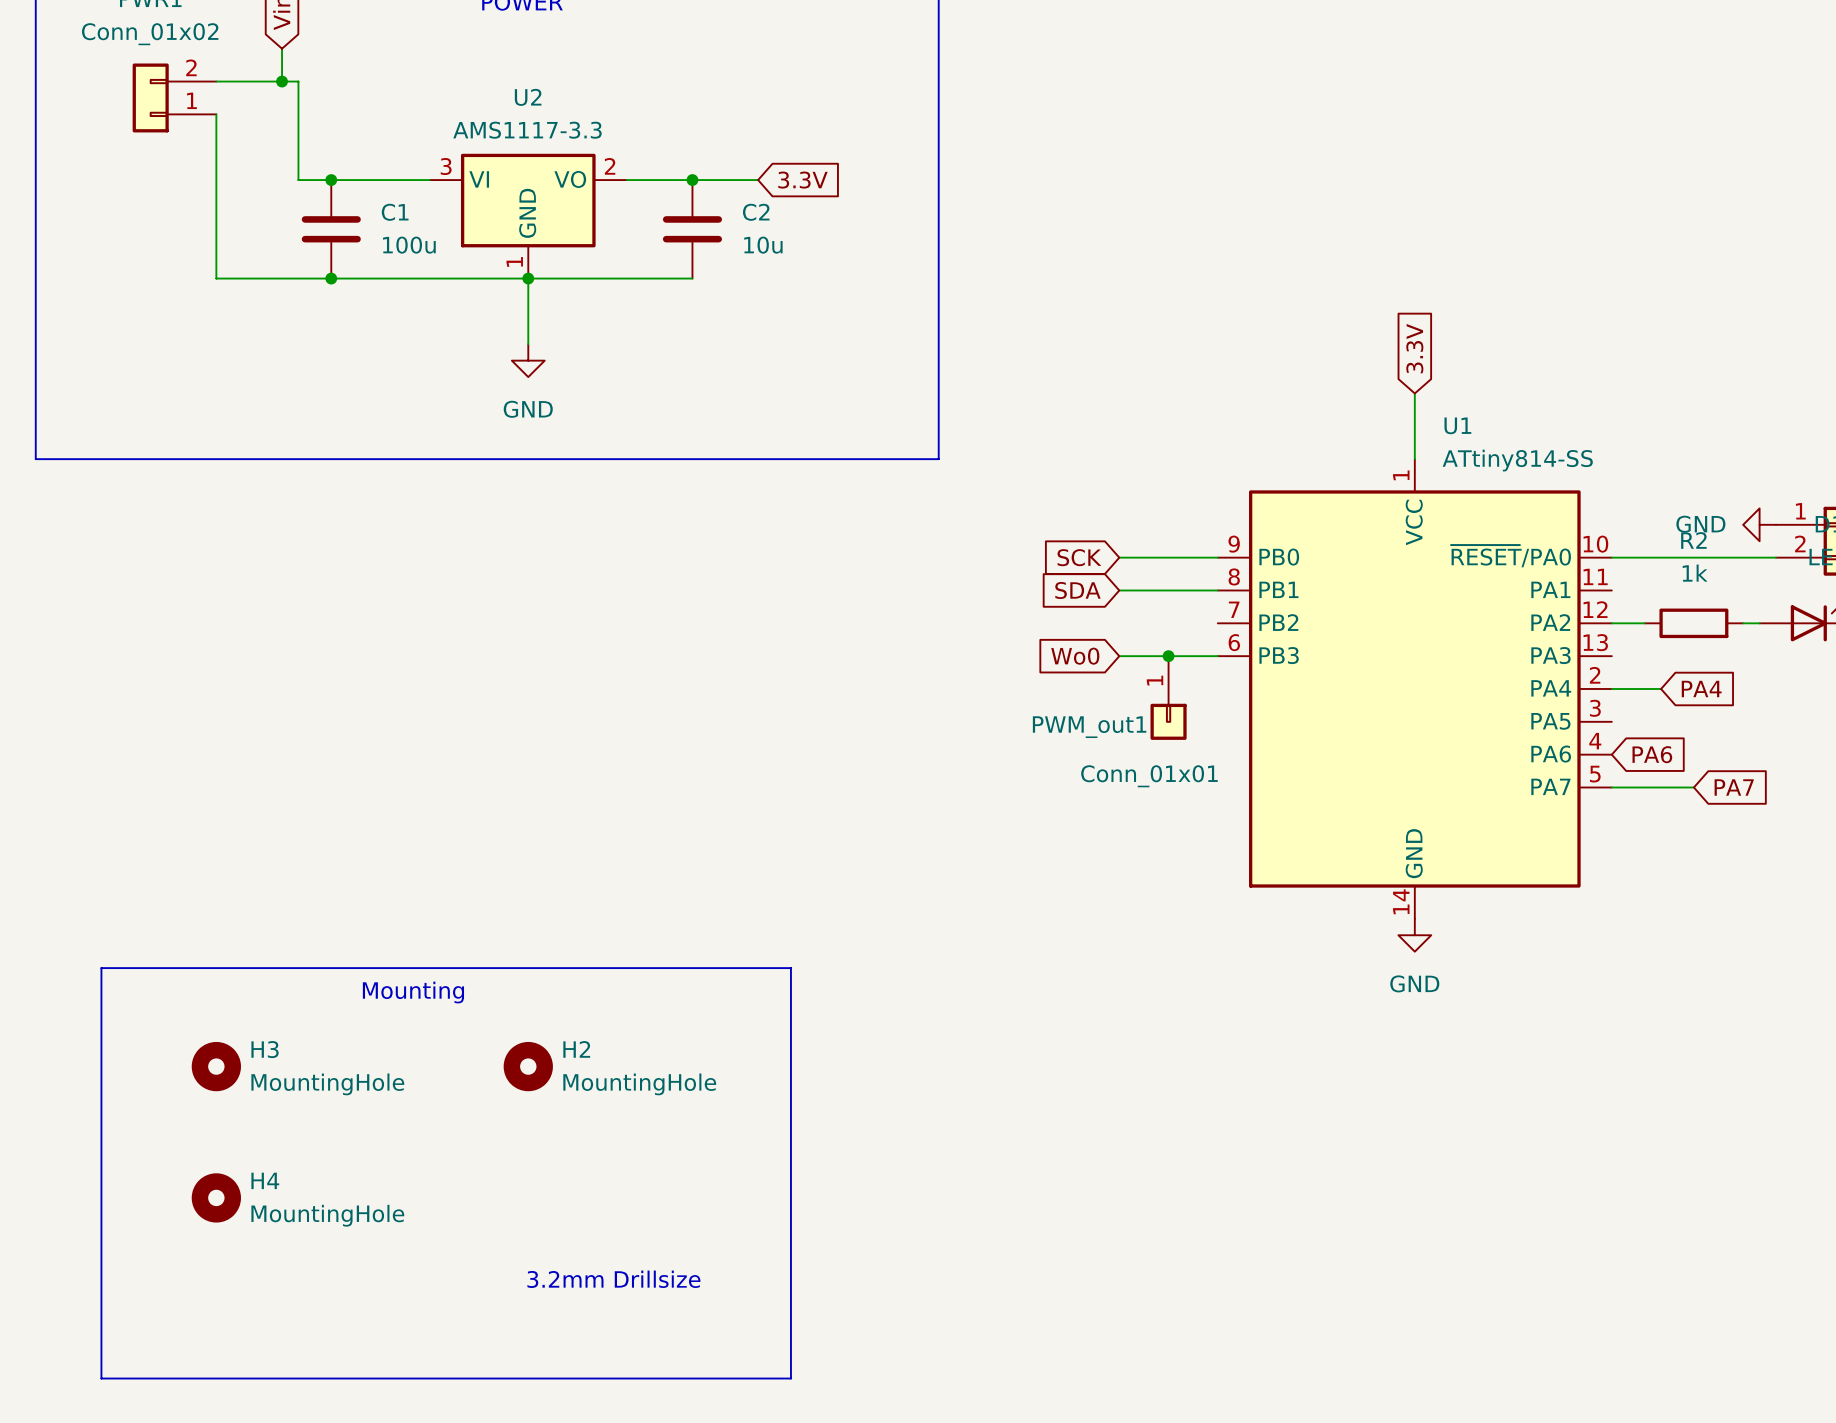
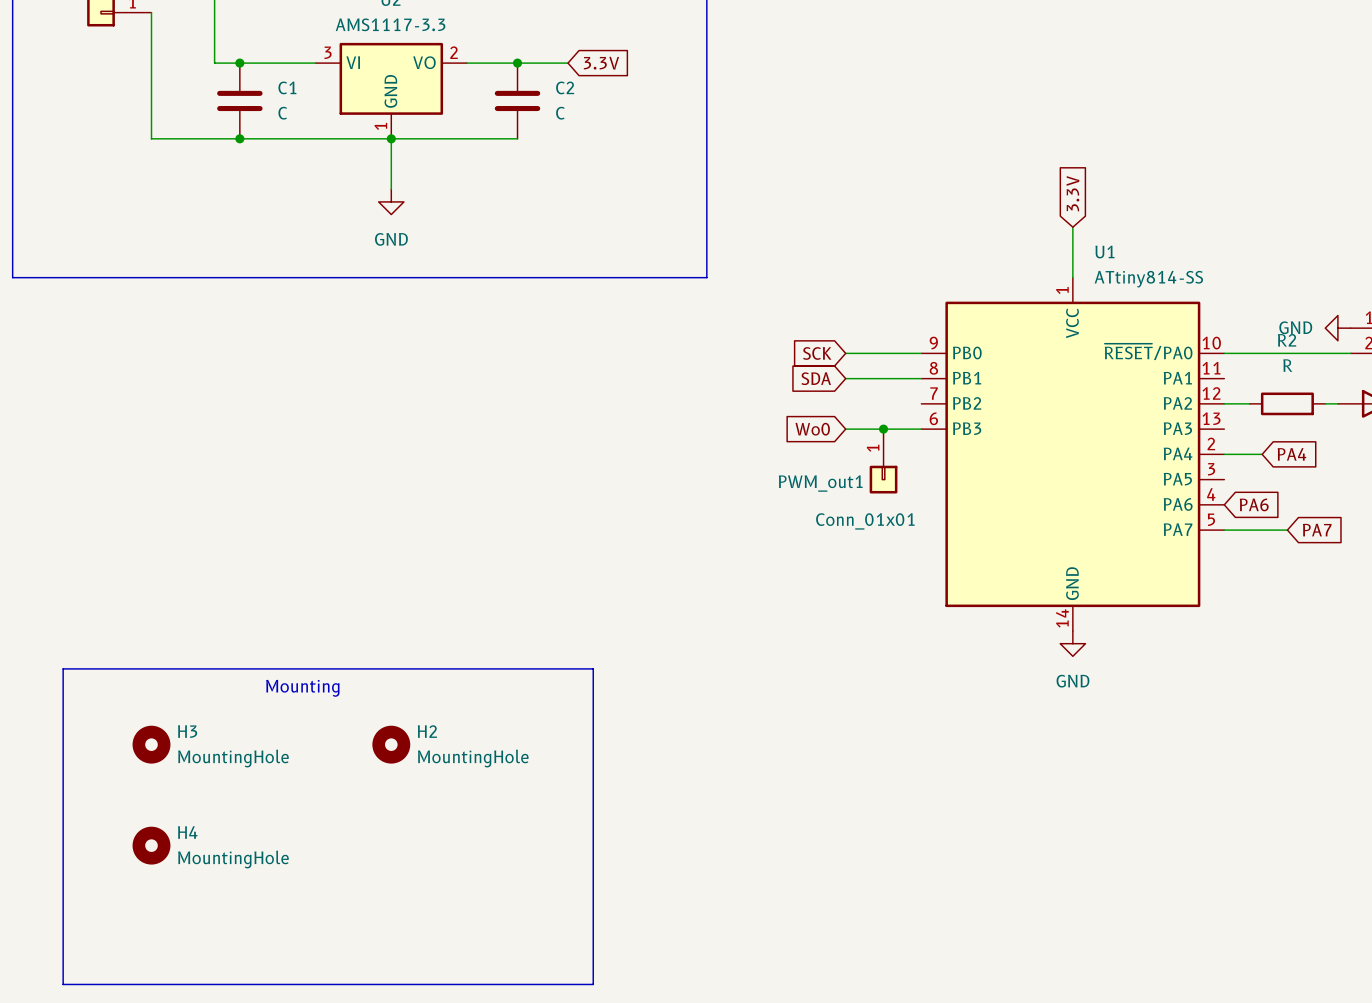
C1 value: 100u (409, 245) -> C (282, 113)
C2 value: 10u (763, 245) -> C (560, 113)
R2 value: 1k (1695, 573) -> R (1287, 365)
text: 3.2mm Drillsize (613, 1279) -> none

